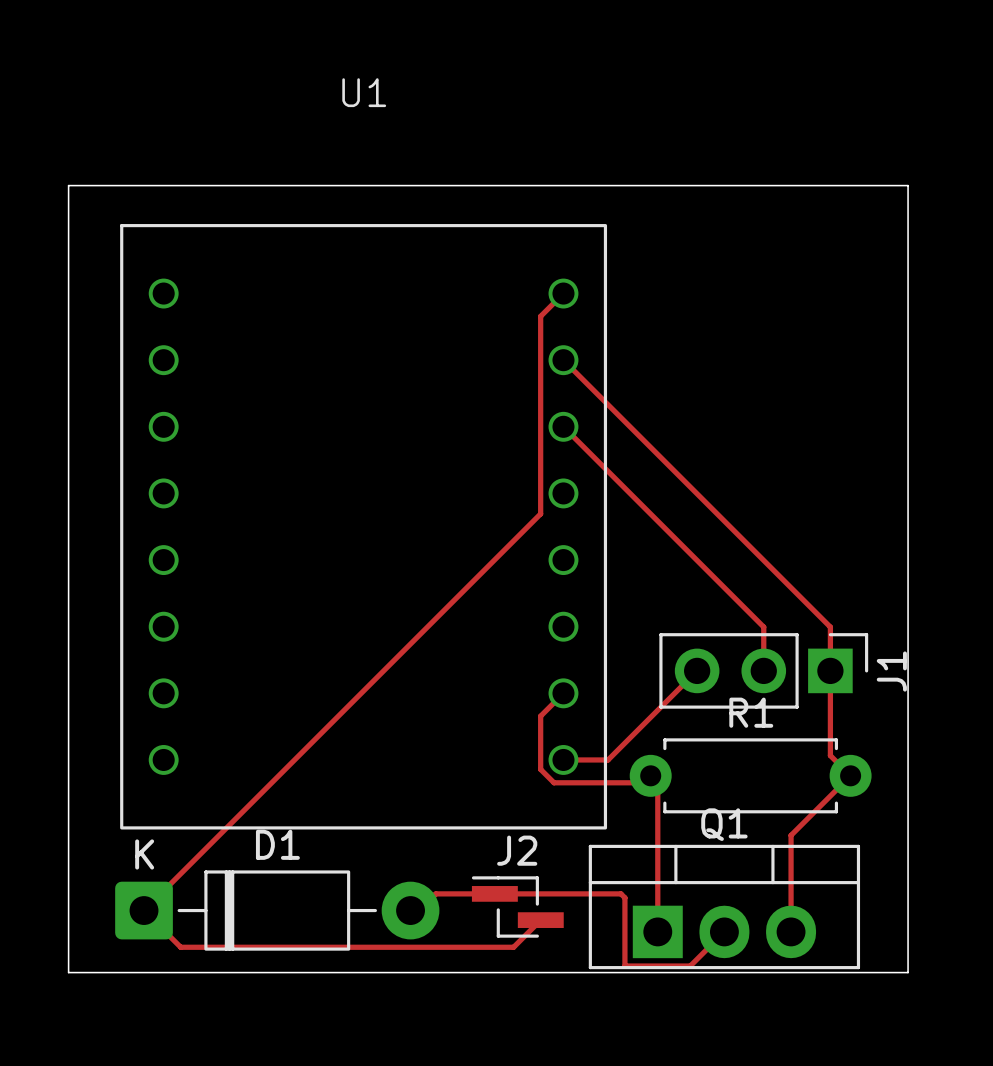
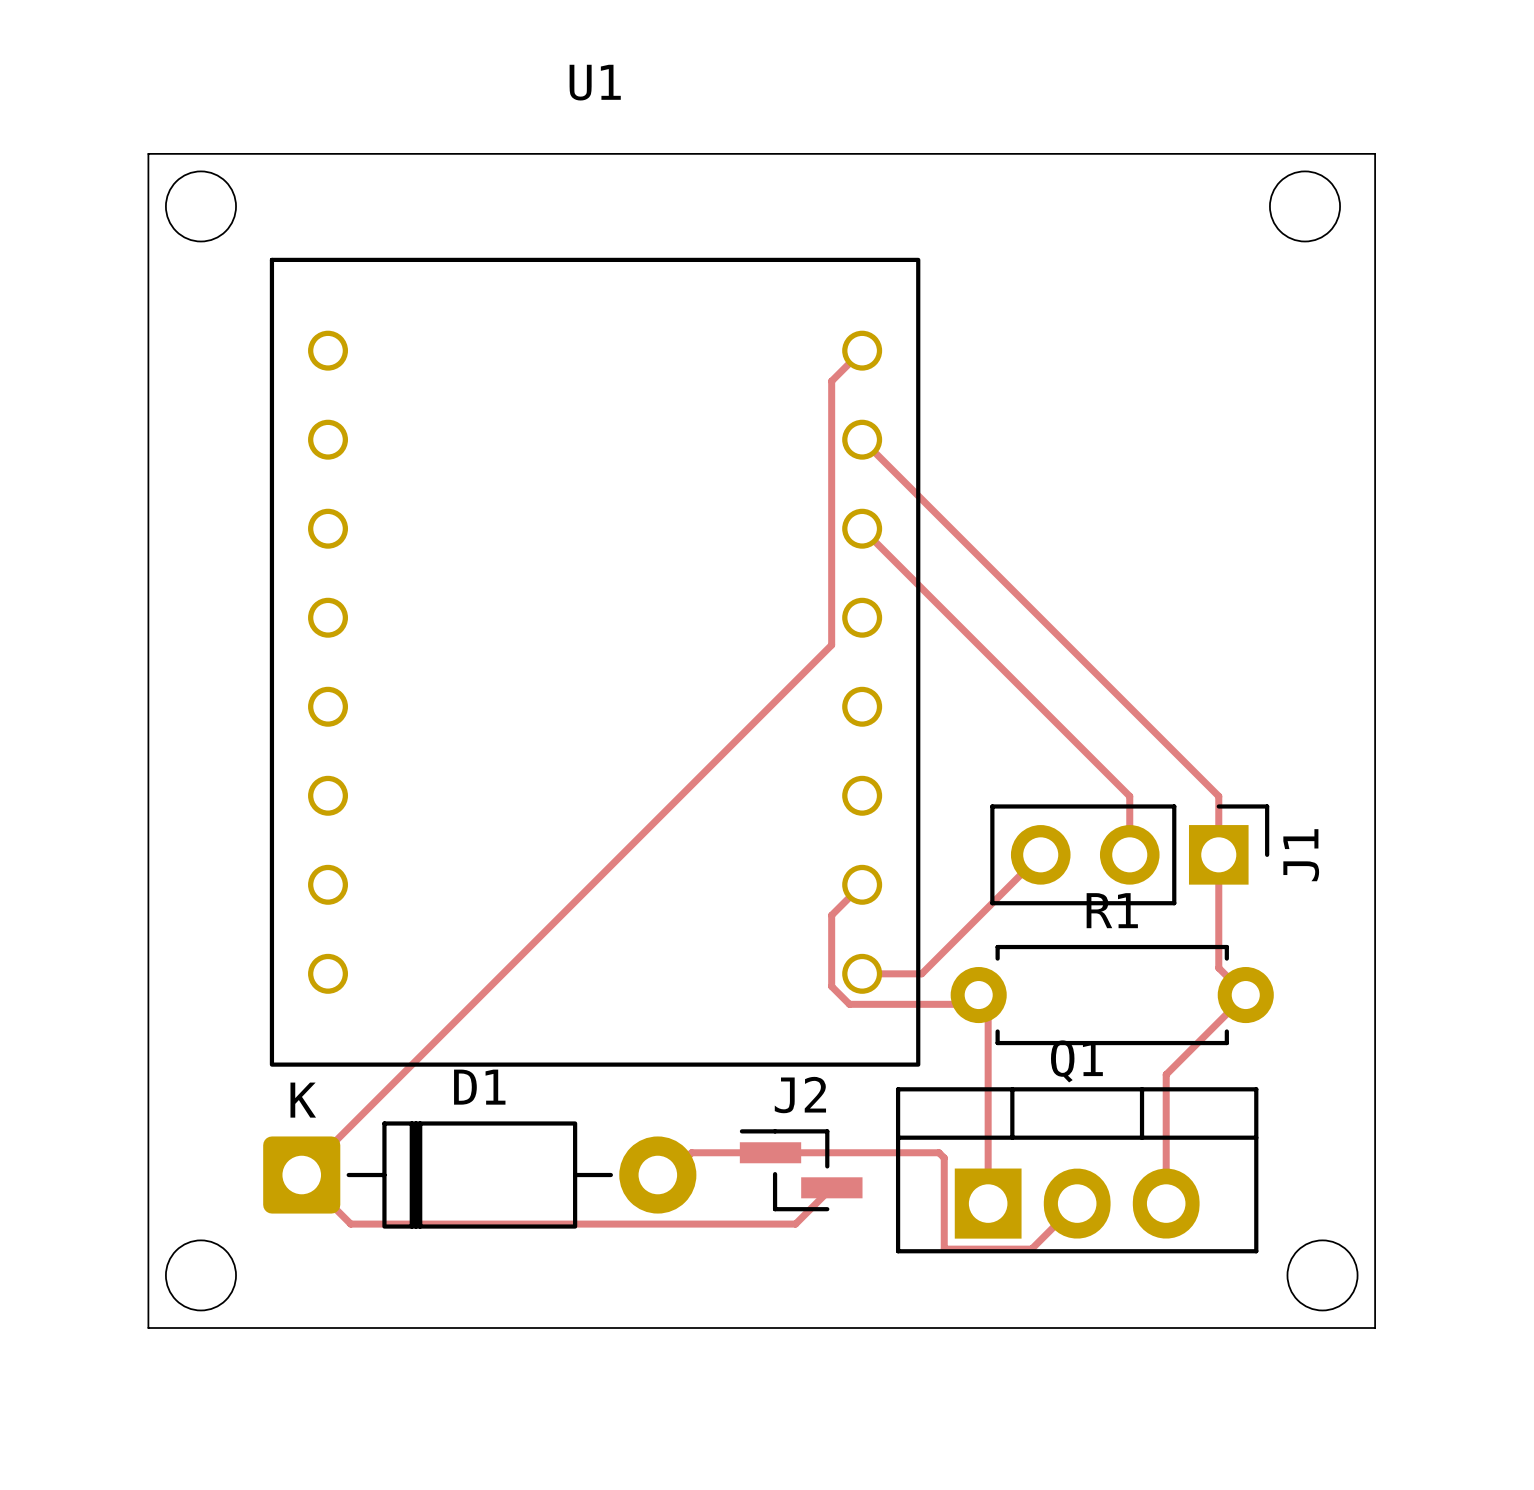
round board edge: none -> [165, 170, 237, 243]
round board edge: none -> [1269, 170, 1341, 243]
board edge: (68, 185) (908, 185) (908, 972) (68, 972) (68, 185) -> (148, 153) (148, 1328) (1375, 1328) (1375, 153) (148, 153)
round board edge: none -> [165, 1239, 237, 1312]
round board edge: none -> [1286, 1239, 1359, 1312]

